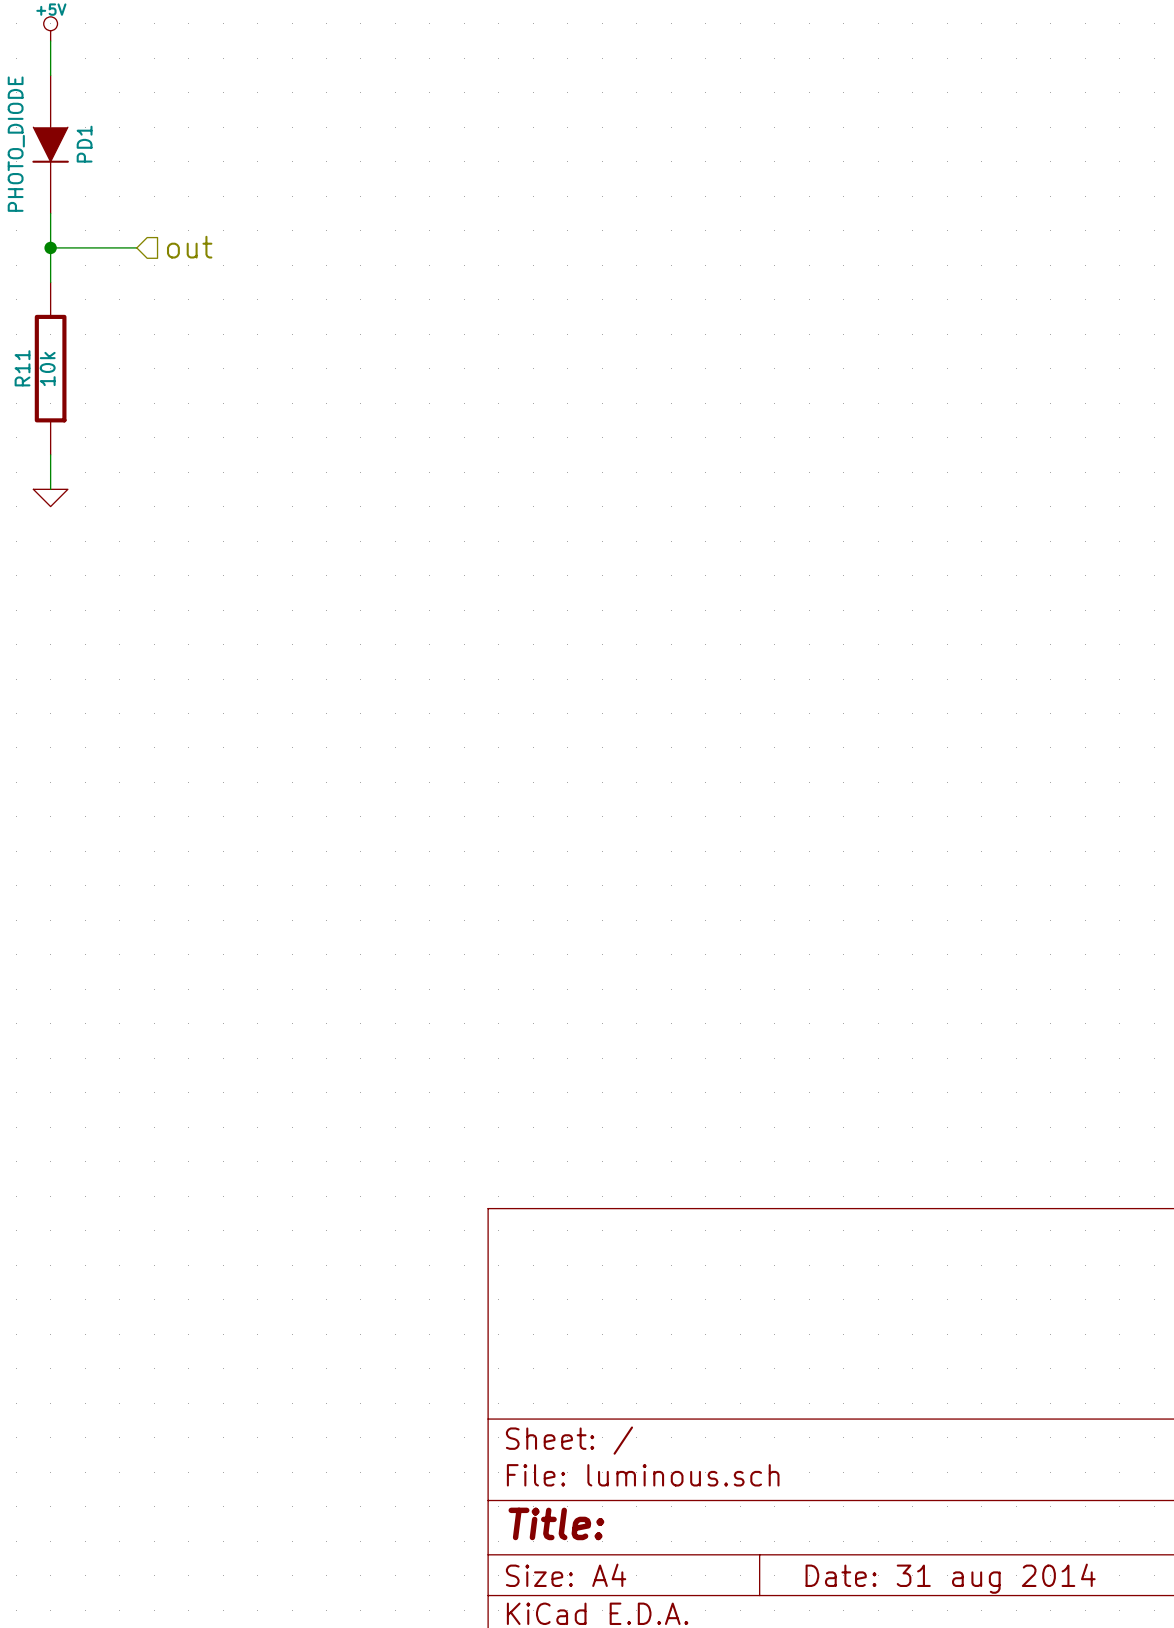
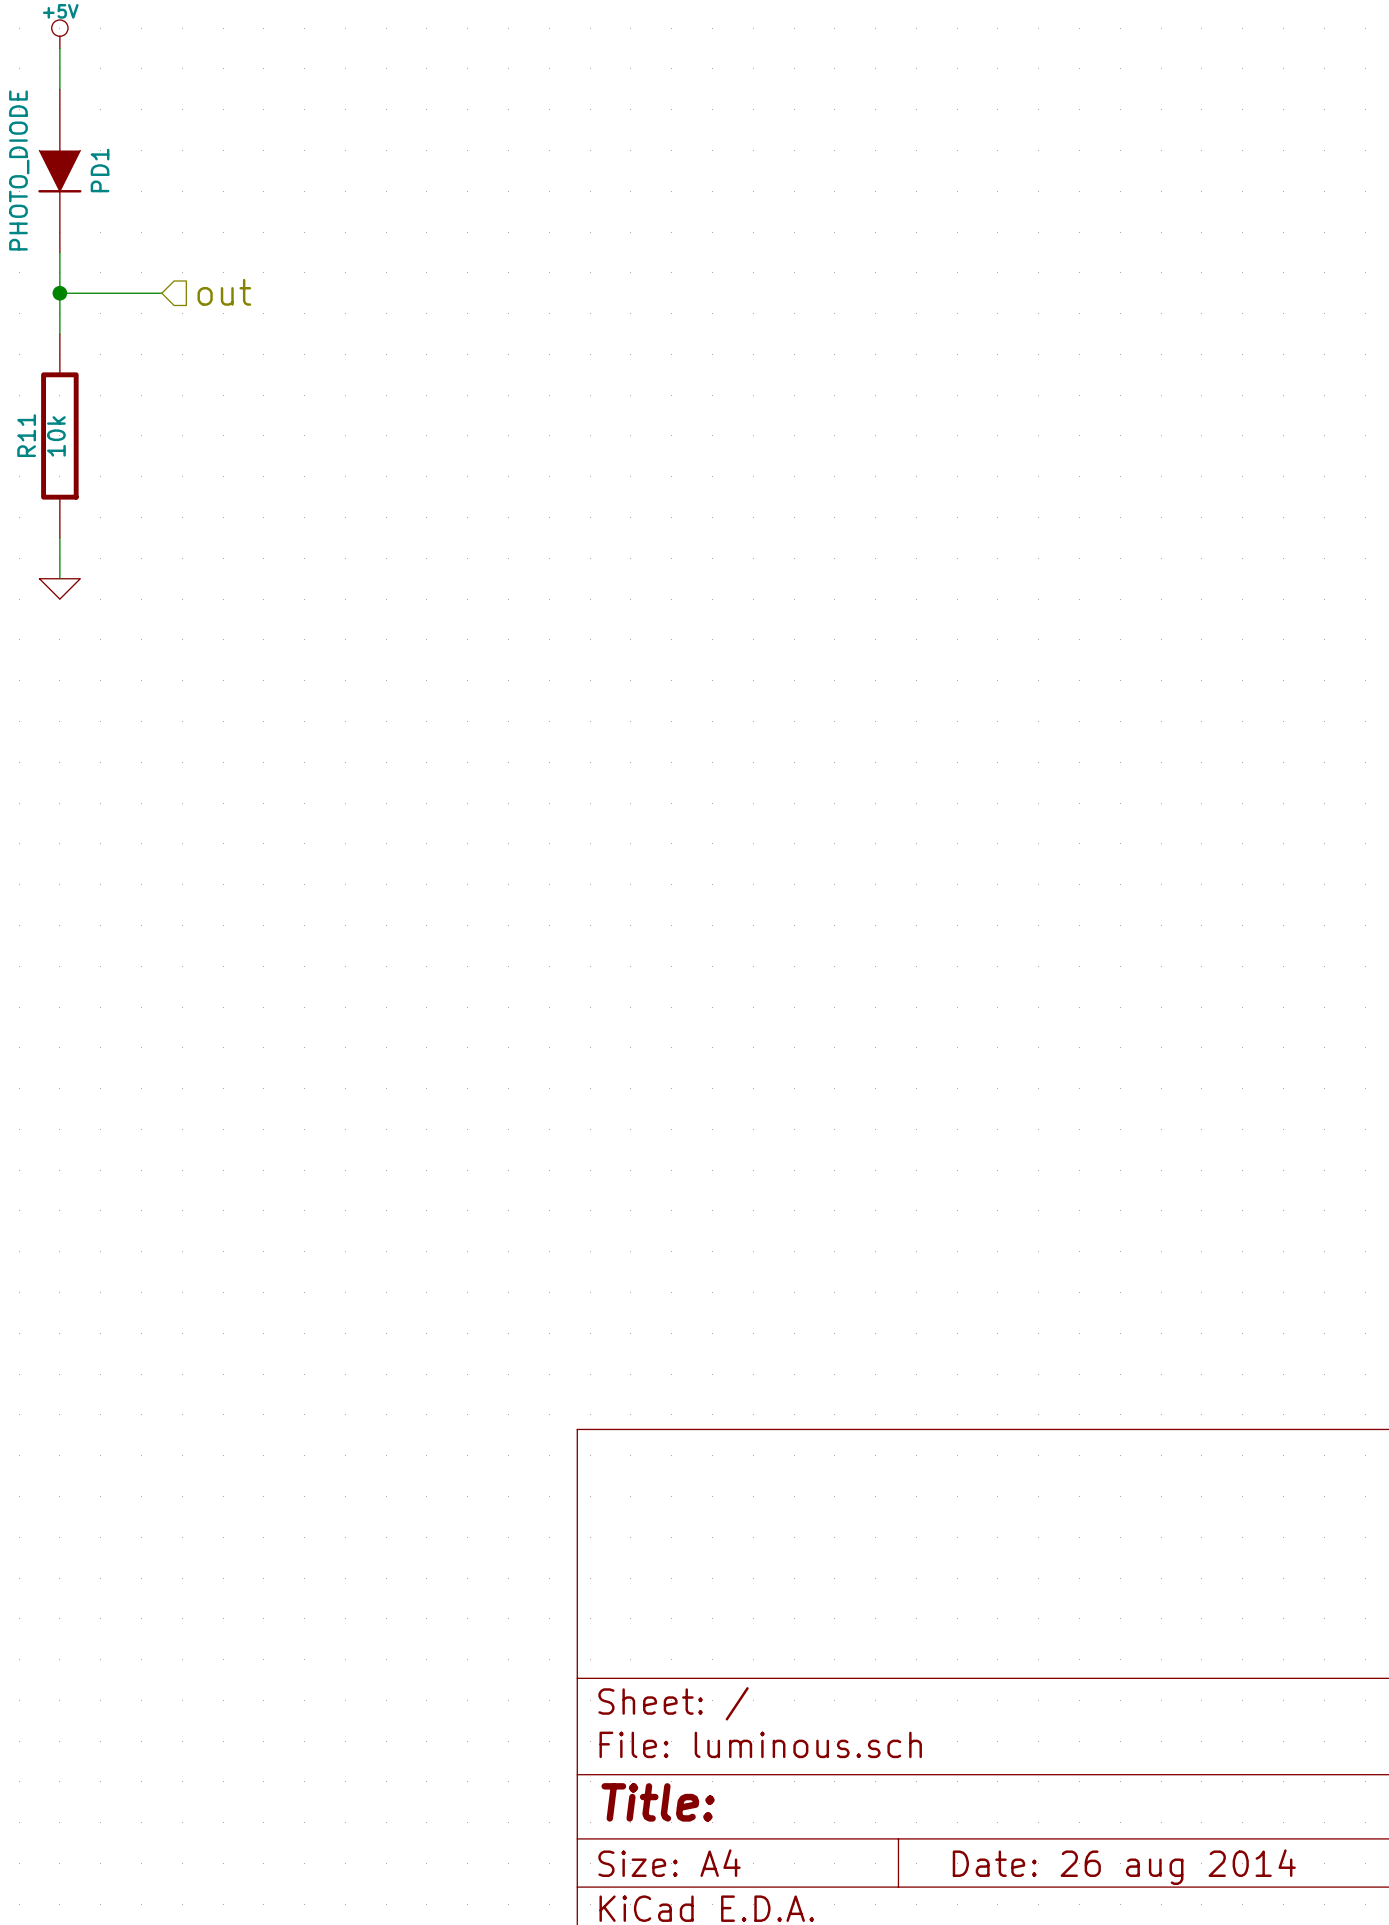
title block: Date: 31 aug 2014 (950, 1578) -> Date: 26 aug 2014 (1124, 1867)

